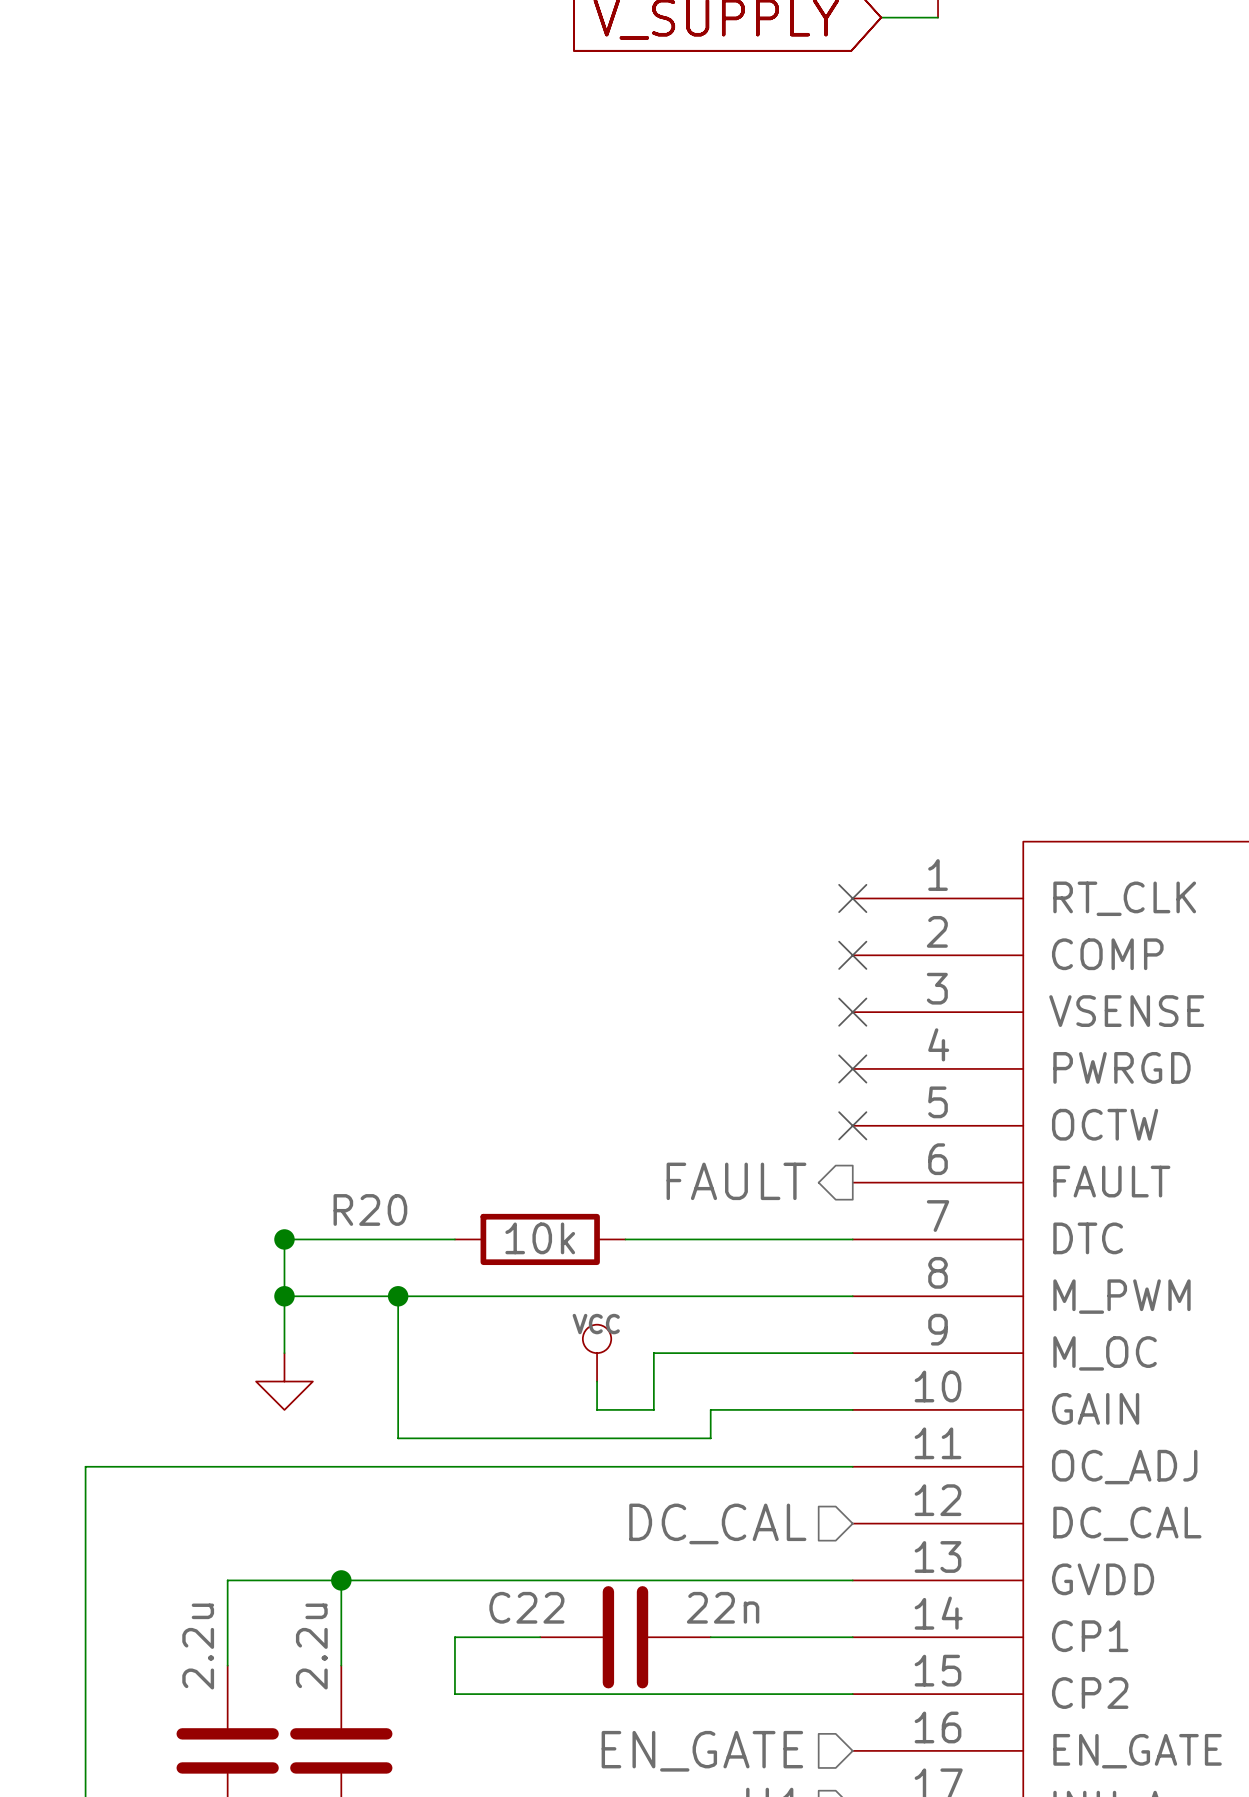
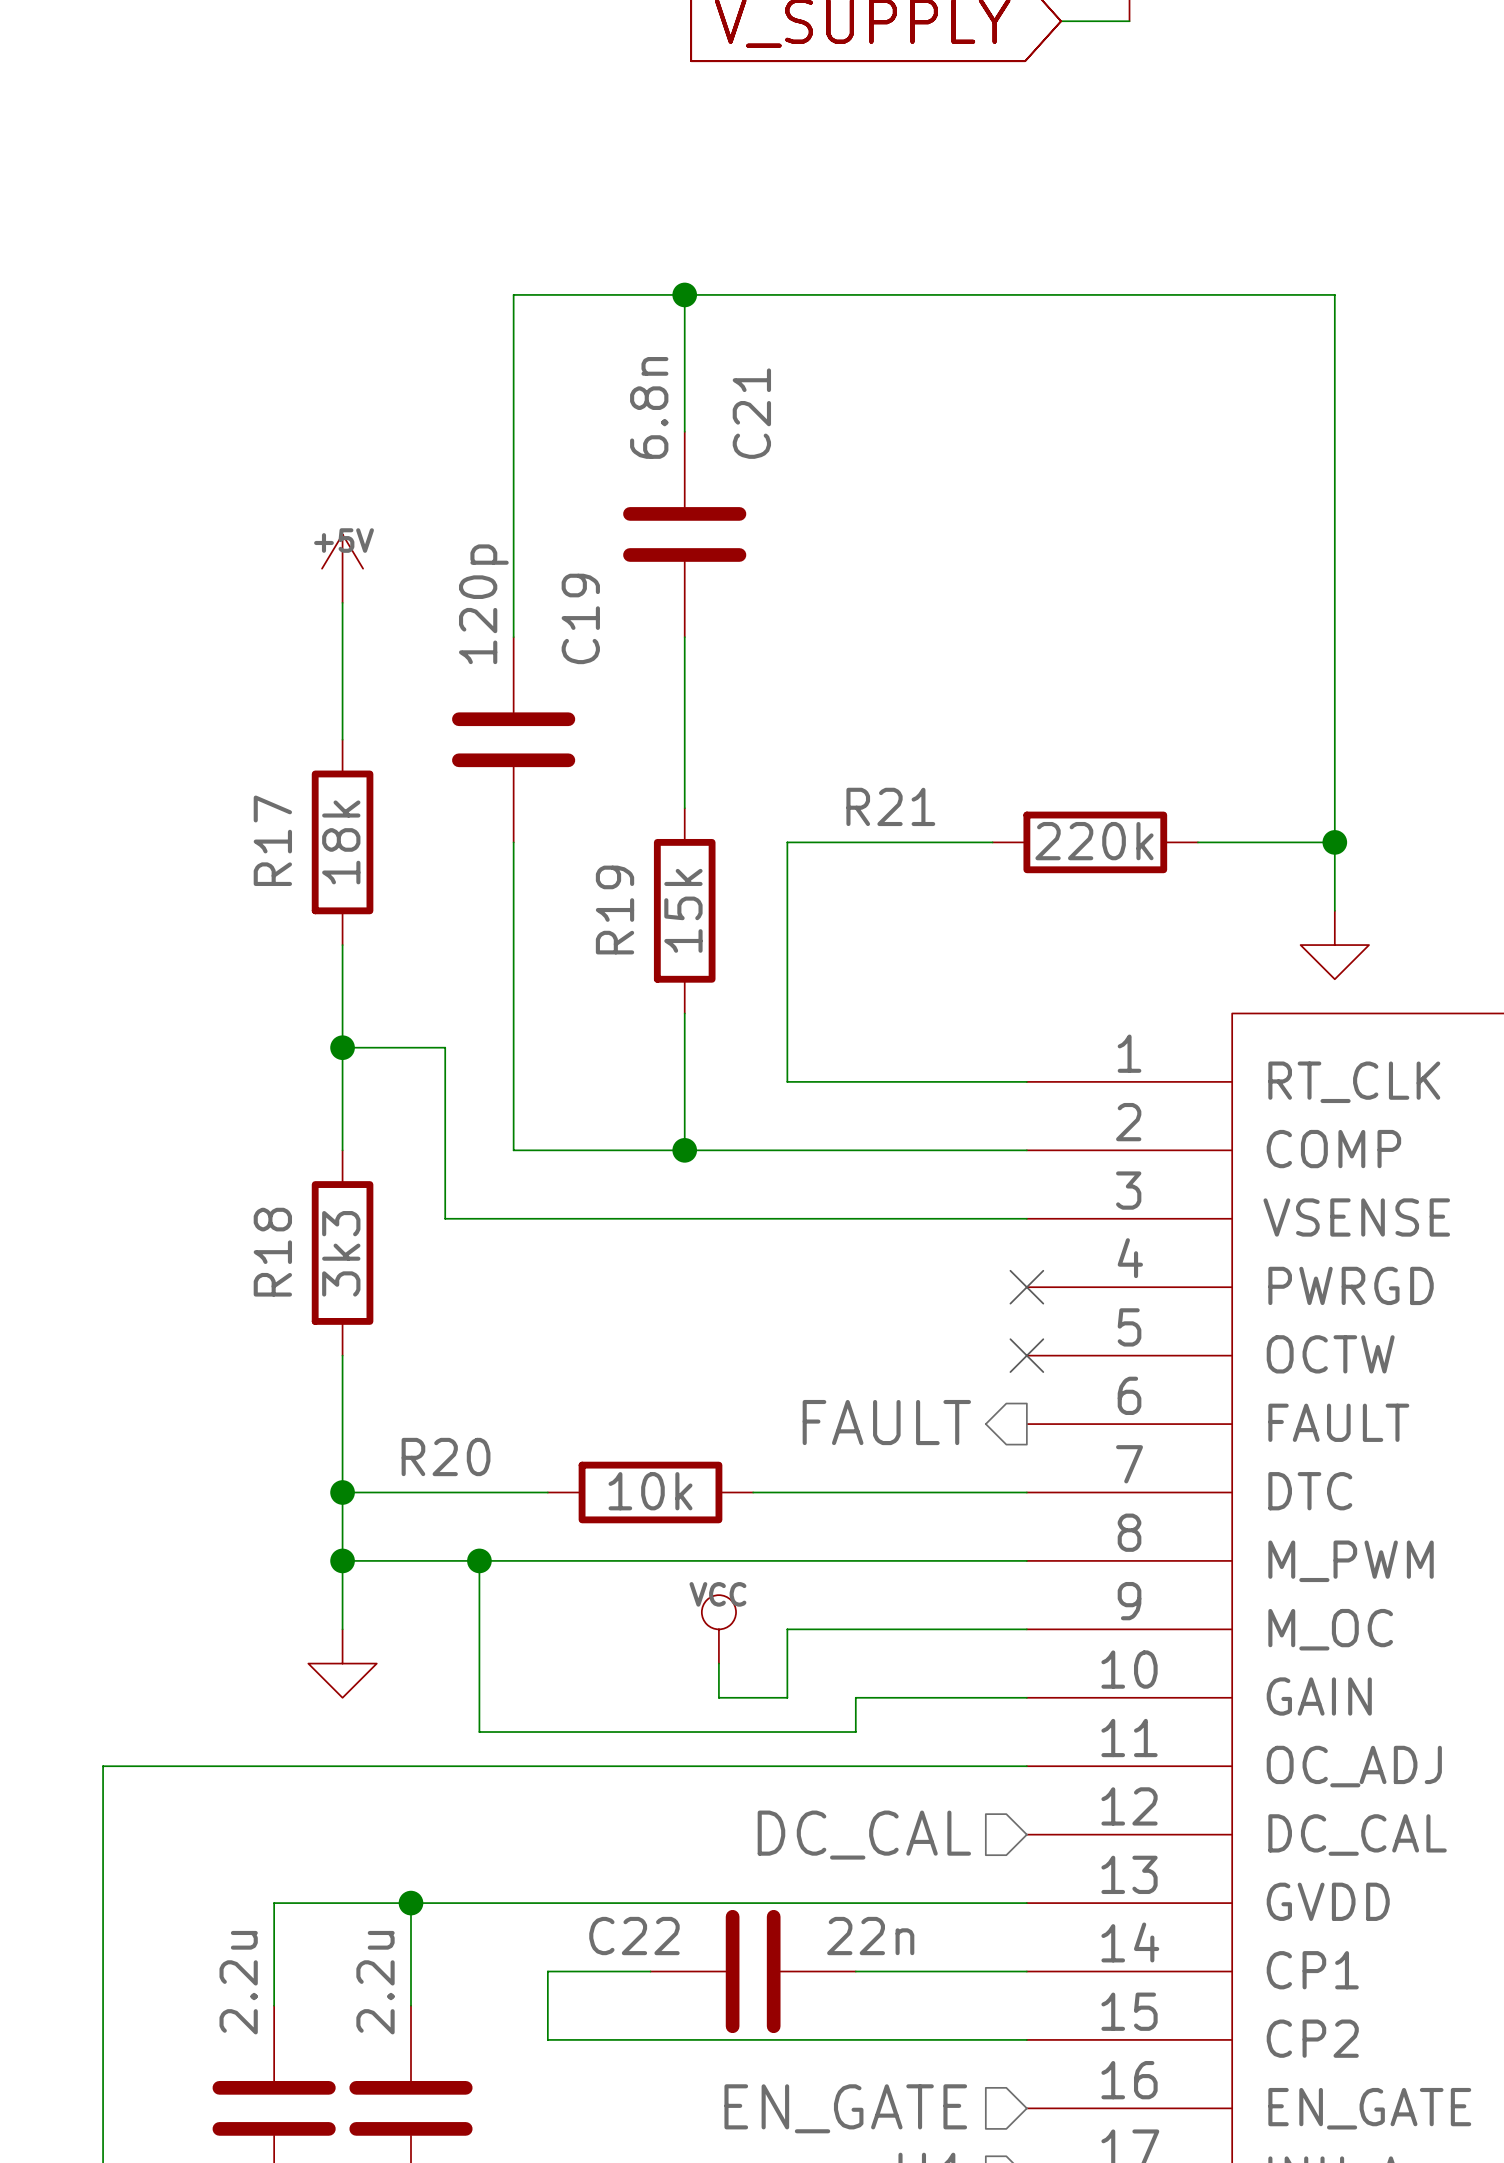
wire: none -> (684, 294) (684, 431)
junction: none -> (684, 294)
C21: none -> 6.8n (684, 534)
power symbol: none -> +5V (342, 568)
wire: none -> (342, 602) (342, 739)
wire: none -> (513, 637) (513, 294) (1334, 294) (1334, 910)
wire: none -> (684, 637) (684, 808)
C19: none -> 120p (513, 739)
R17: none -> 18k (342, 842)
wire: none -> (513, 842) (513, 1150) (1026, 1150)
wire: none -> (992, 842) (787, 842) (787, 1081) (1026, 1081)
R21: none -> 220k (1095, 842)
wire: none -> (1197, 842) (1334, 842)
junction: none -> (1334, 842)
R19: none -> 15k (684, 910)
wire: none -> (342, 945) (342, 1150)
power symbol: none -> (1334, 945)
wire: none -> (684, 1013) (684, 1150)
wire: none -> (342, 1047) (445, 1047) (445, 1218) (1026, 1218)
junction: none -> (342, 1047)
no-connect mark: (852, 898) -> none
junction: none -> (684, 1150)
no-connect mark: (852, 955) -> none
no-connect mark: (852, 1012) -> none
R18: none -> 3k3 (342, 1252)
wire: none -> (342, 1355) (342, 1492)

